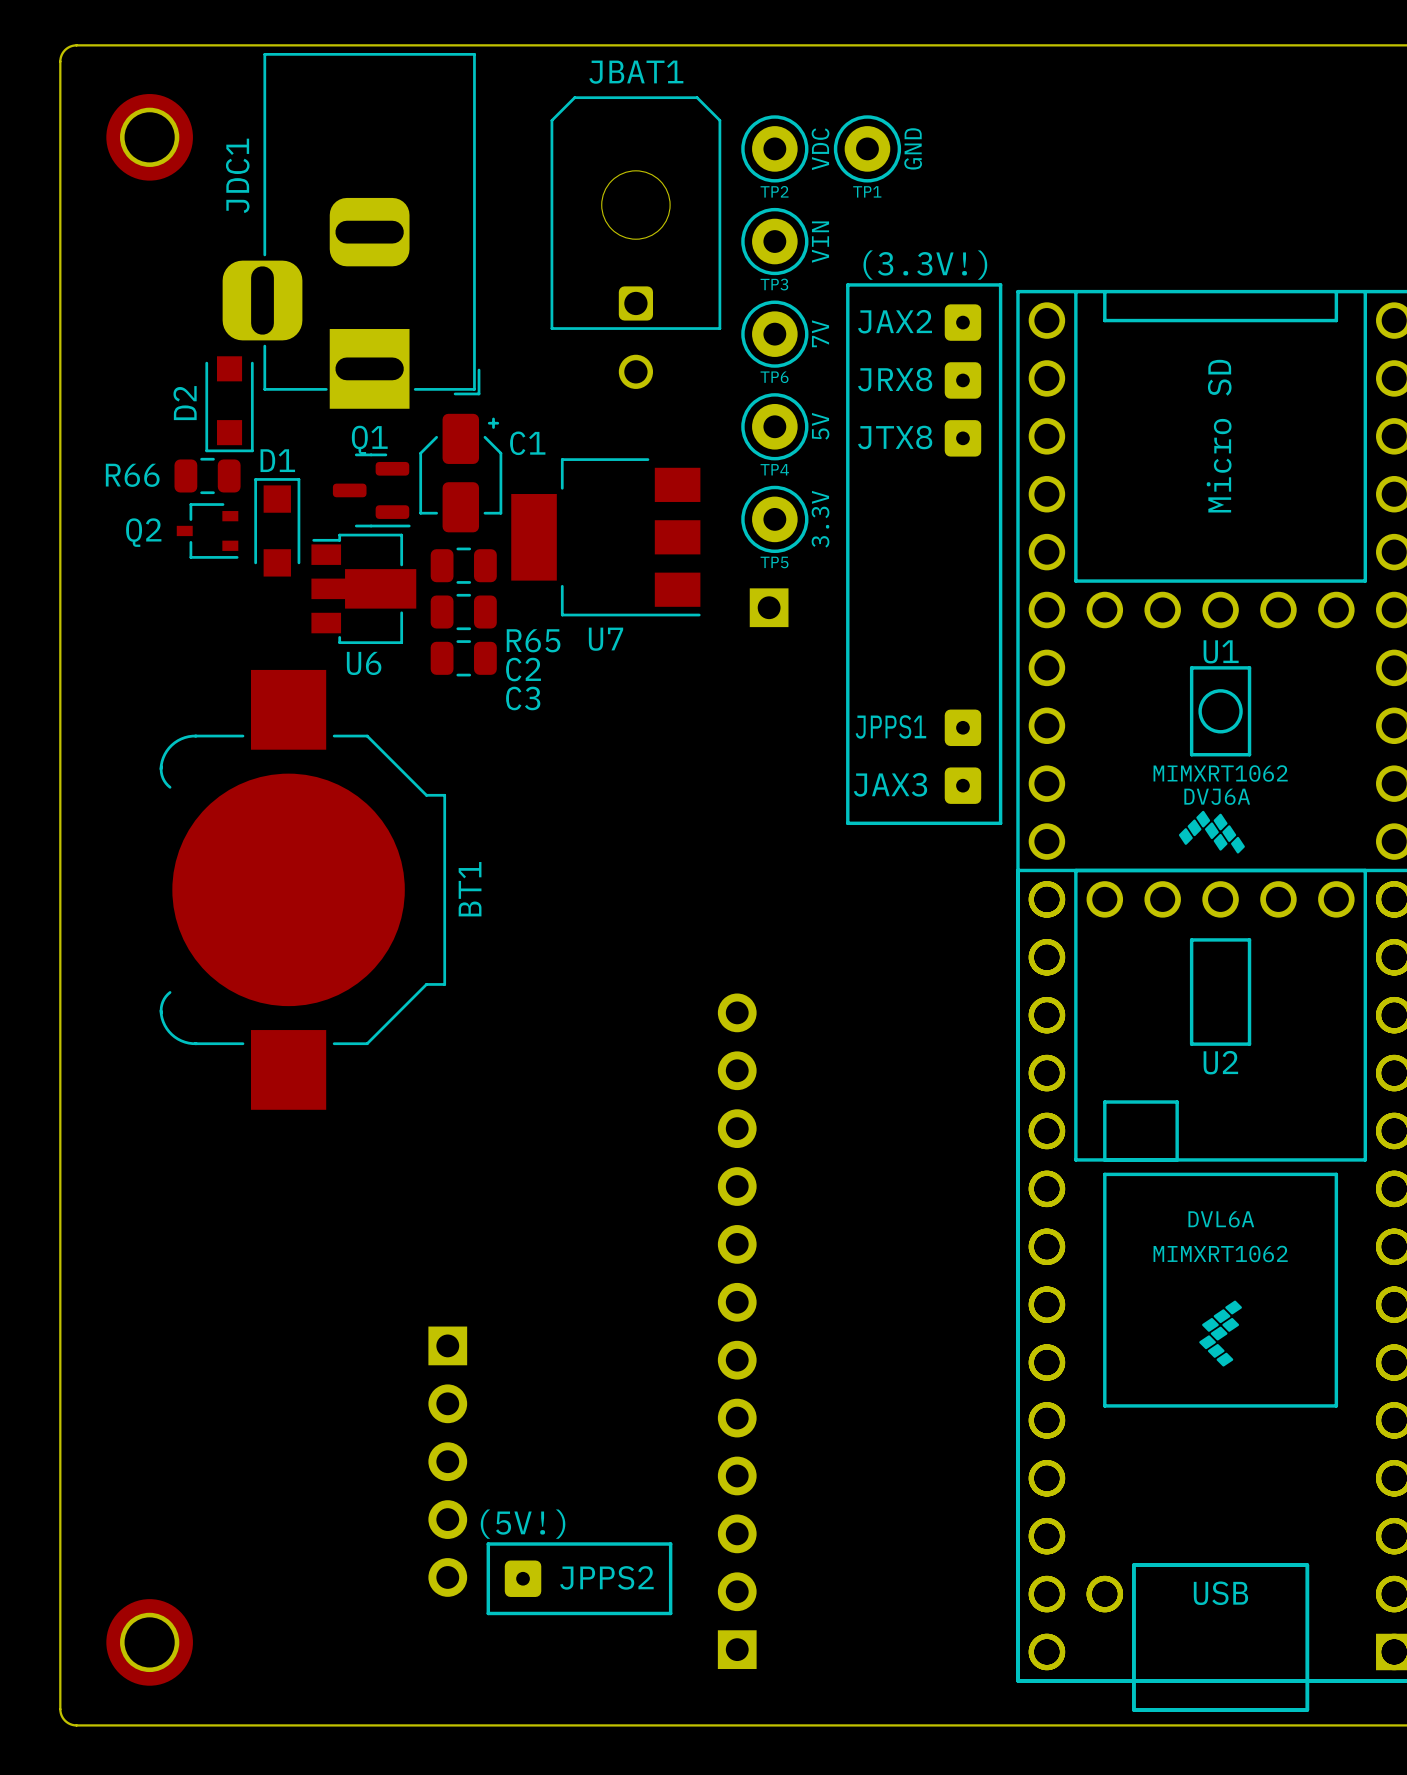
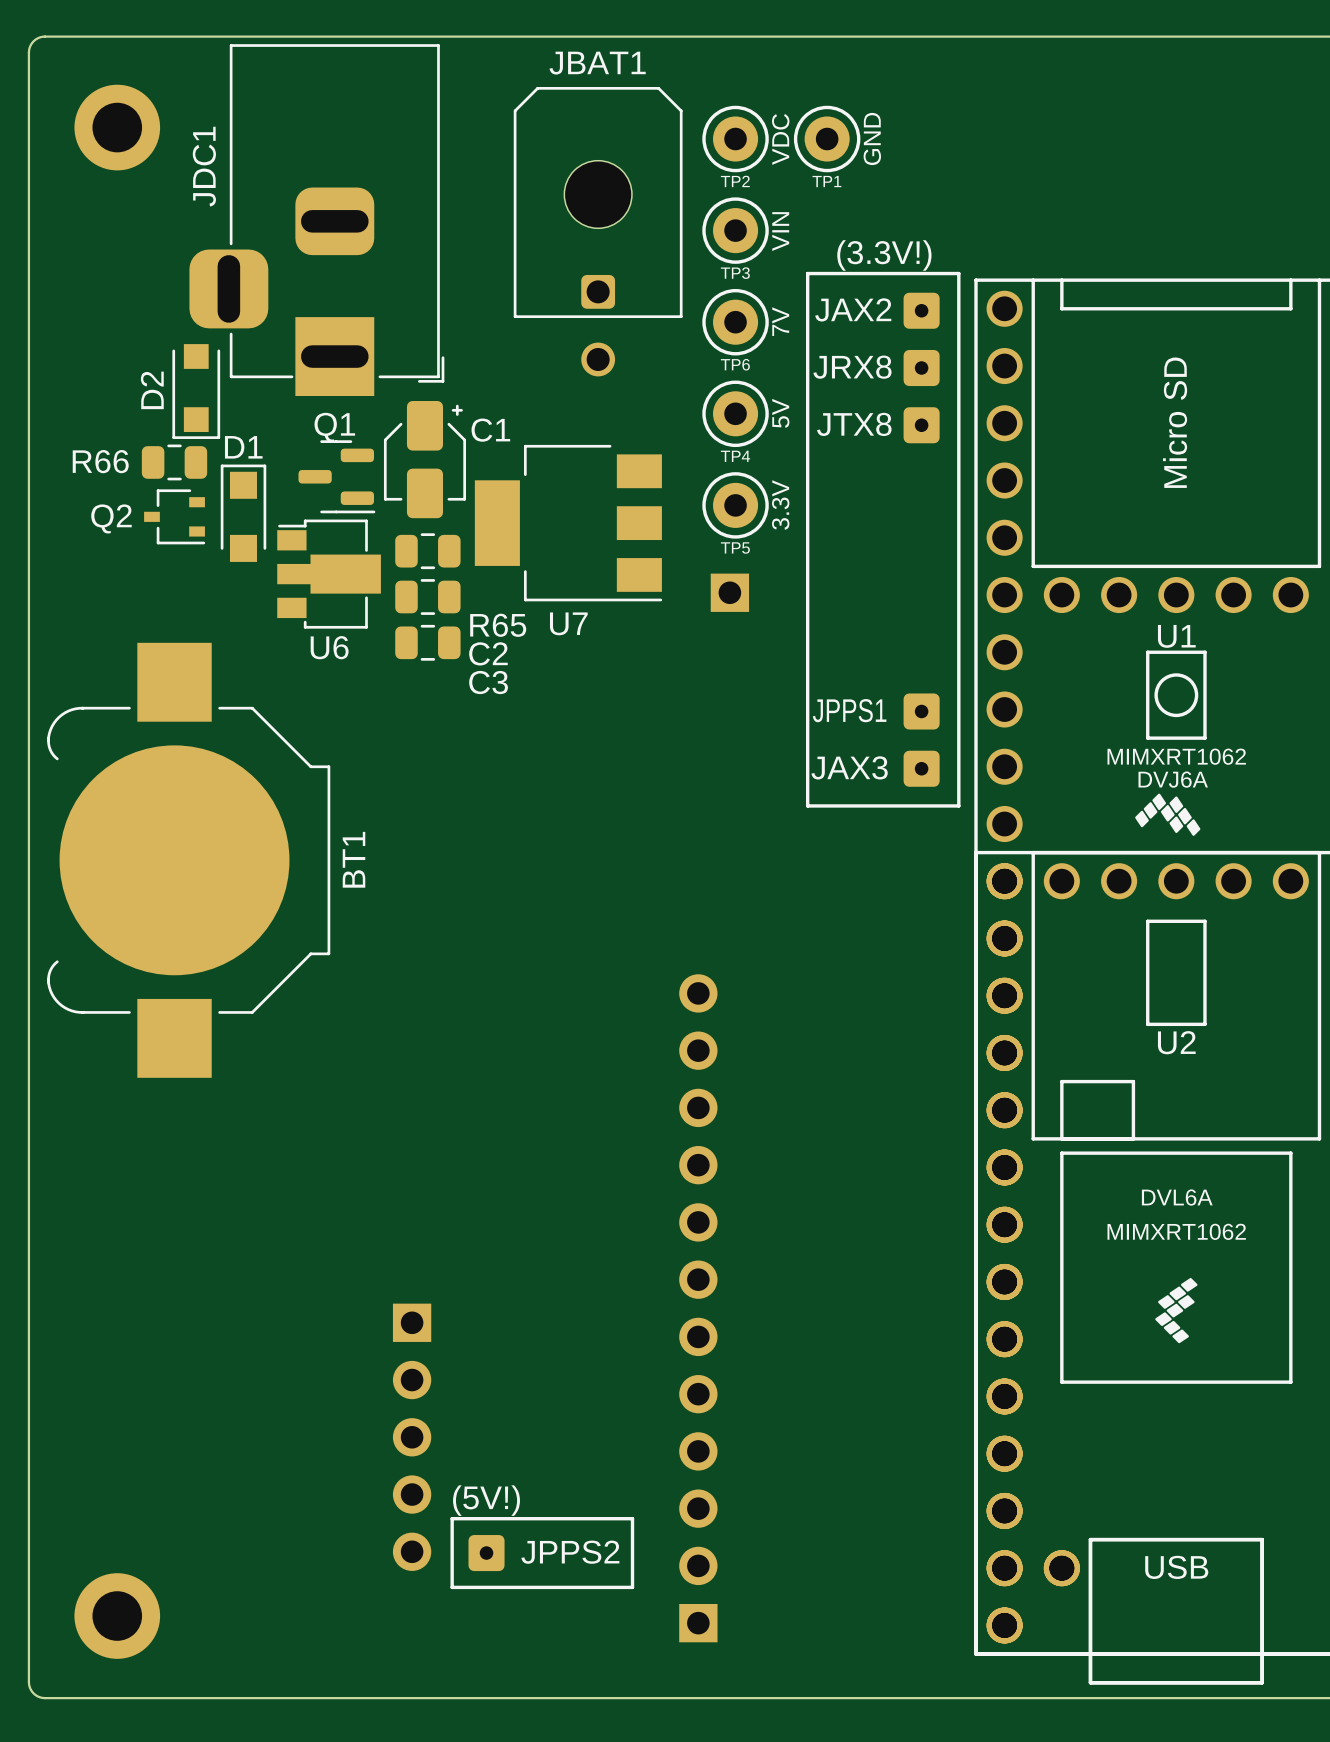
BT1 position: (302, 889) -> (188, 860)

